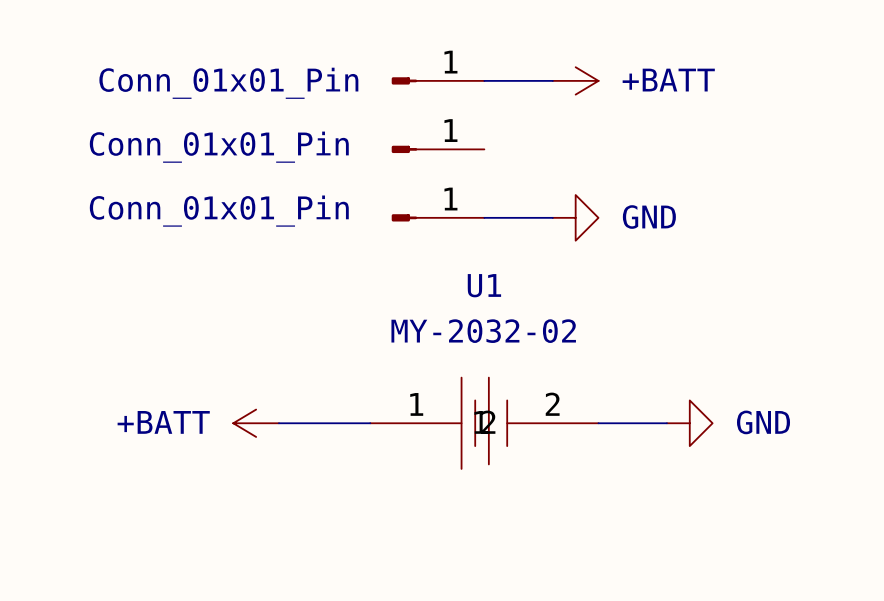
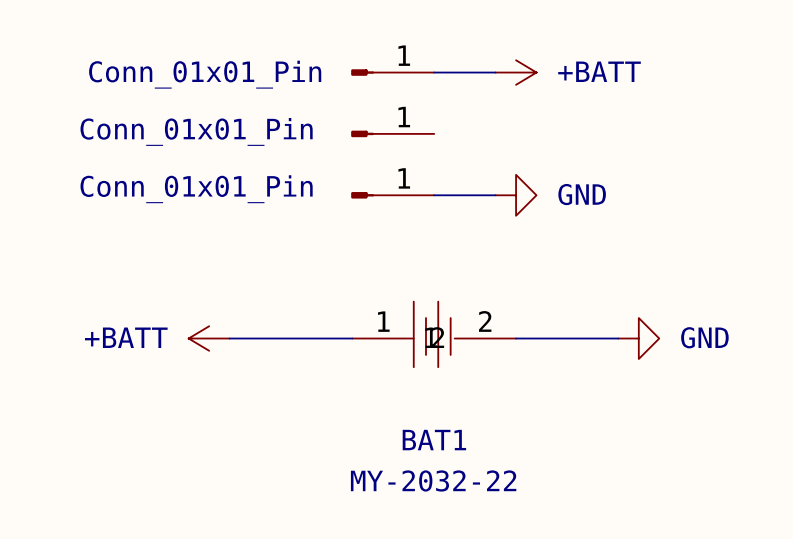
BAT1: none -> MY-2032-22 (434, 334)
wire: none -> (229, 338) (352, 338)
wire: none -> (516, 338) (618, 338)
power symbol position: +BATT (256, 423) -> +BATT (209, 338)
wire: (278, 423) (370, 423) -> none
U1: MY-2032-02 (484, 423) -> none
wire: (598, 423) (666, 423) -> none
power symbol position: GND (689, 423) -> GND (638, 338)

